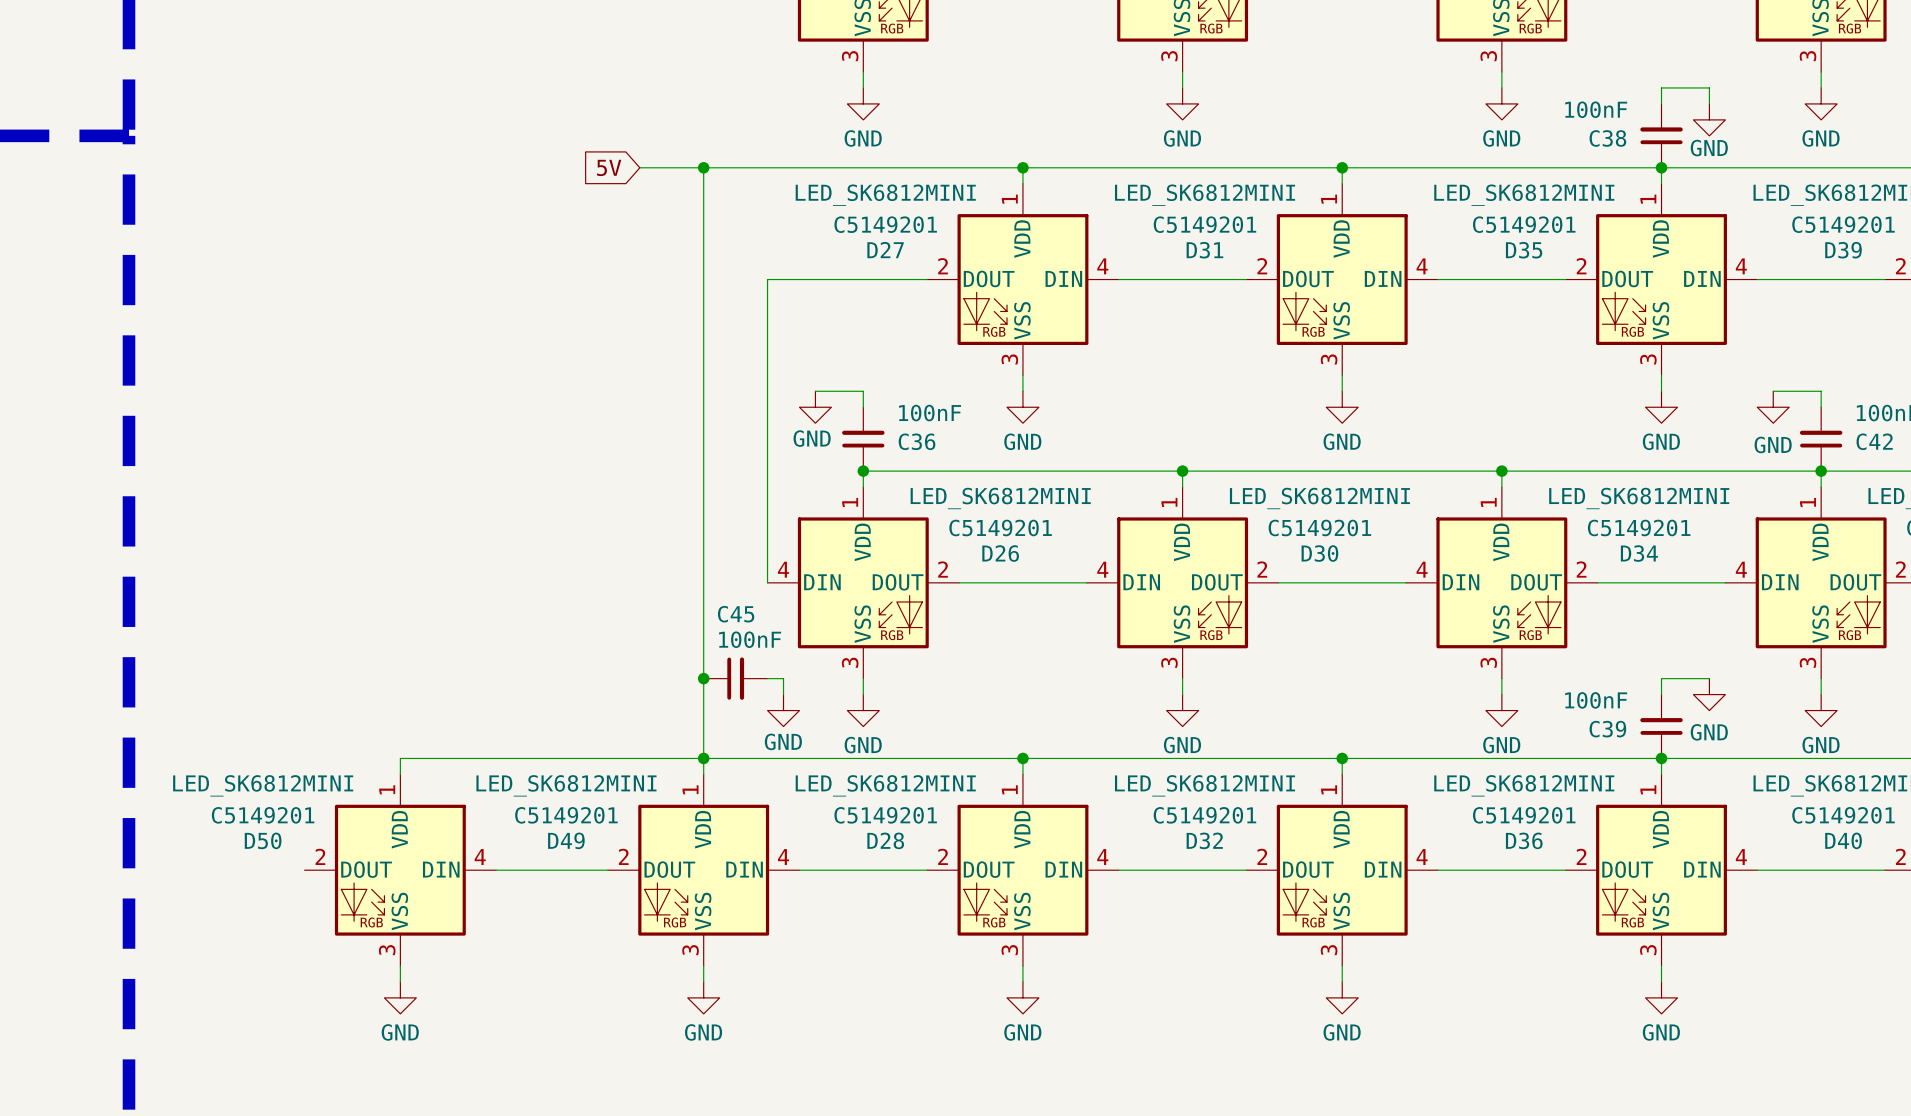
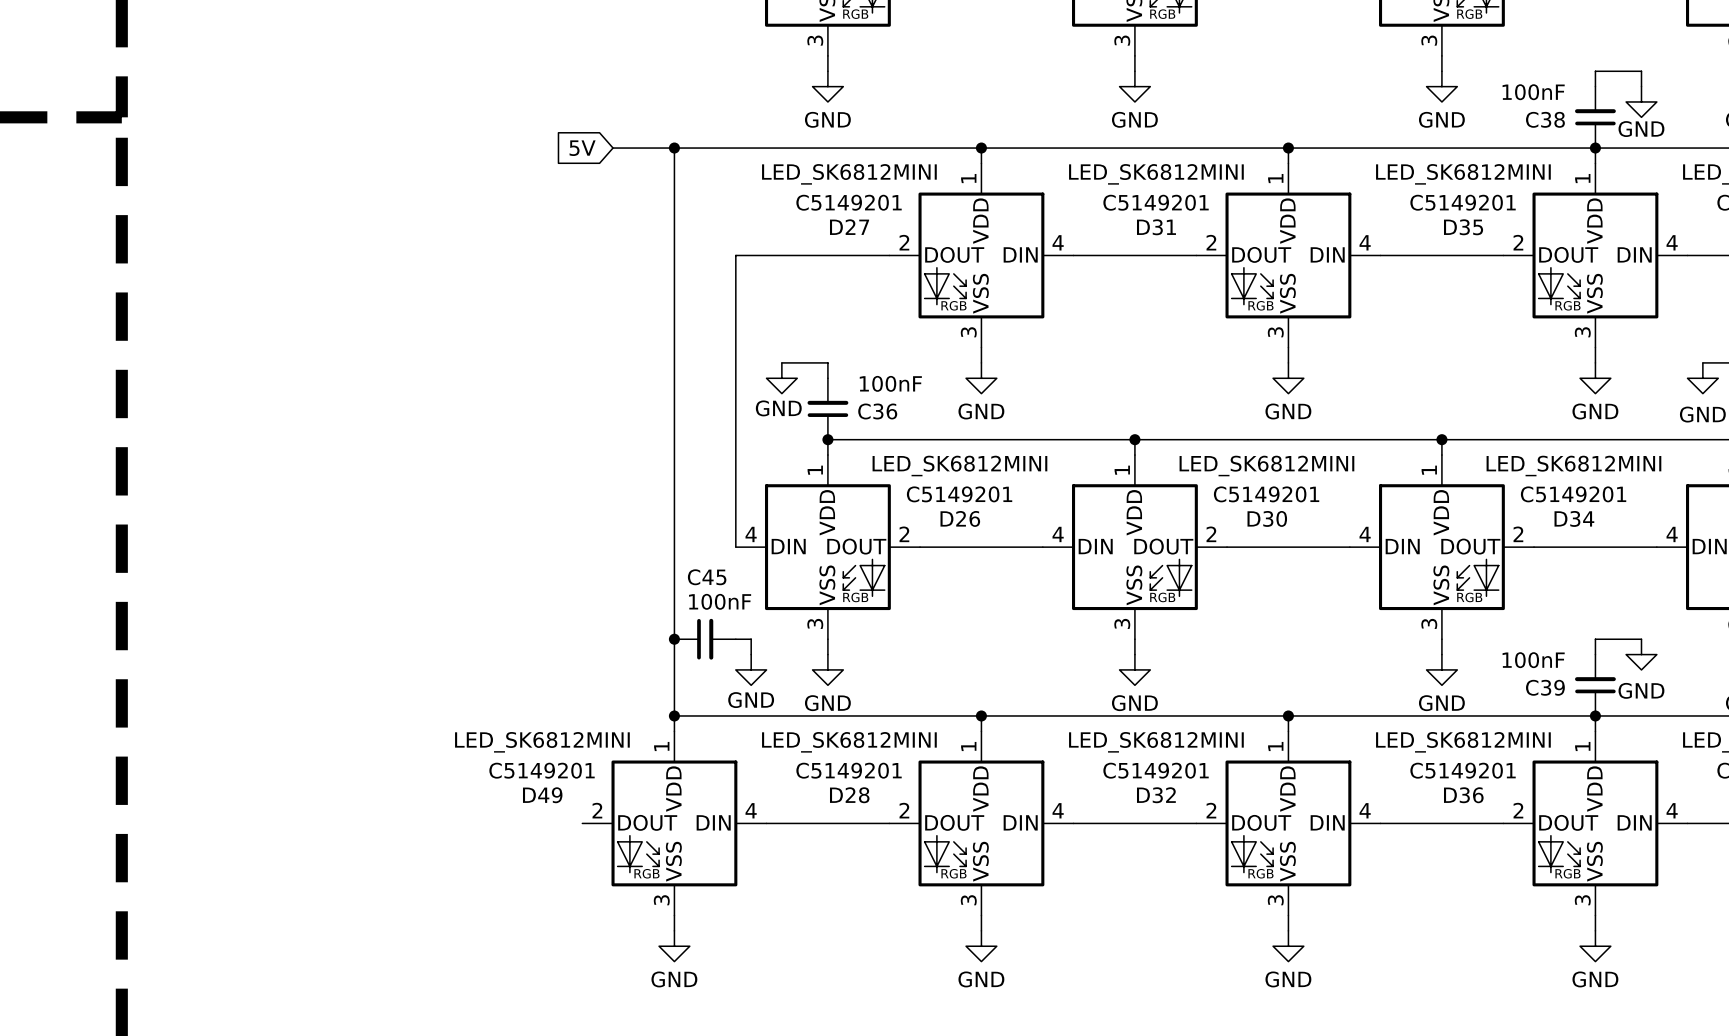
wire: (703, 758) (400, 758) (400, 774) -> none
D50: LED_SK6812MINI (400, 870) -> none
wire: (496, 870) (607, 870) -> none
wire: (400, 965) (400, 981) -> none
power symbol: GND (400, 997) -> none

